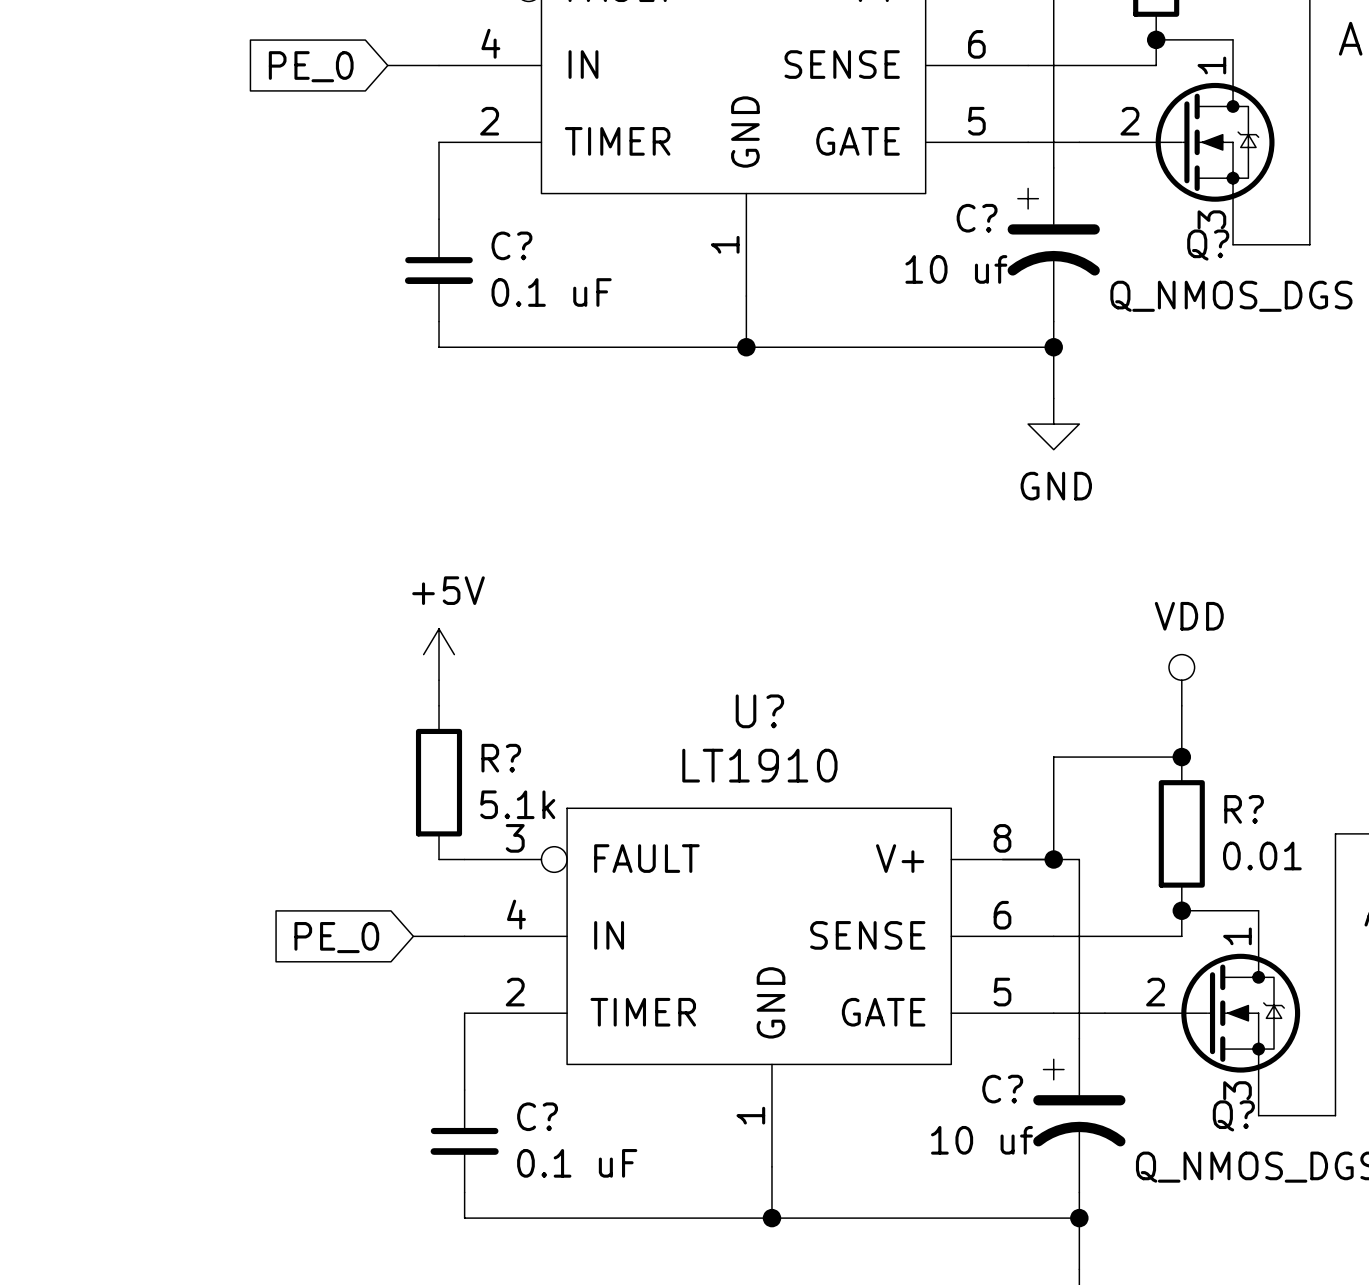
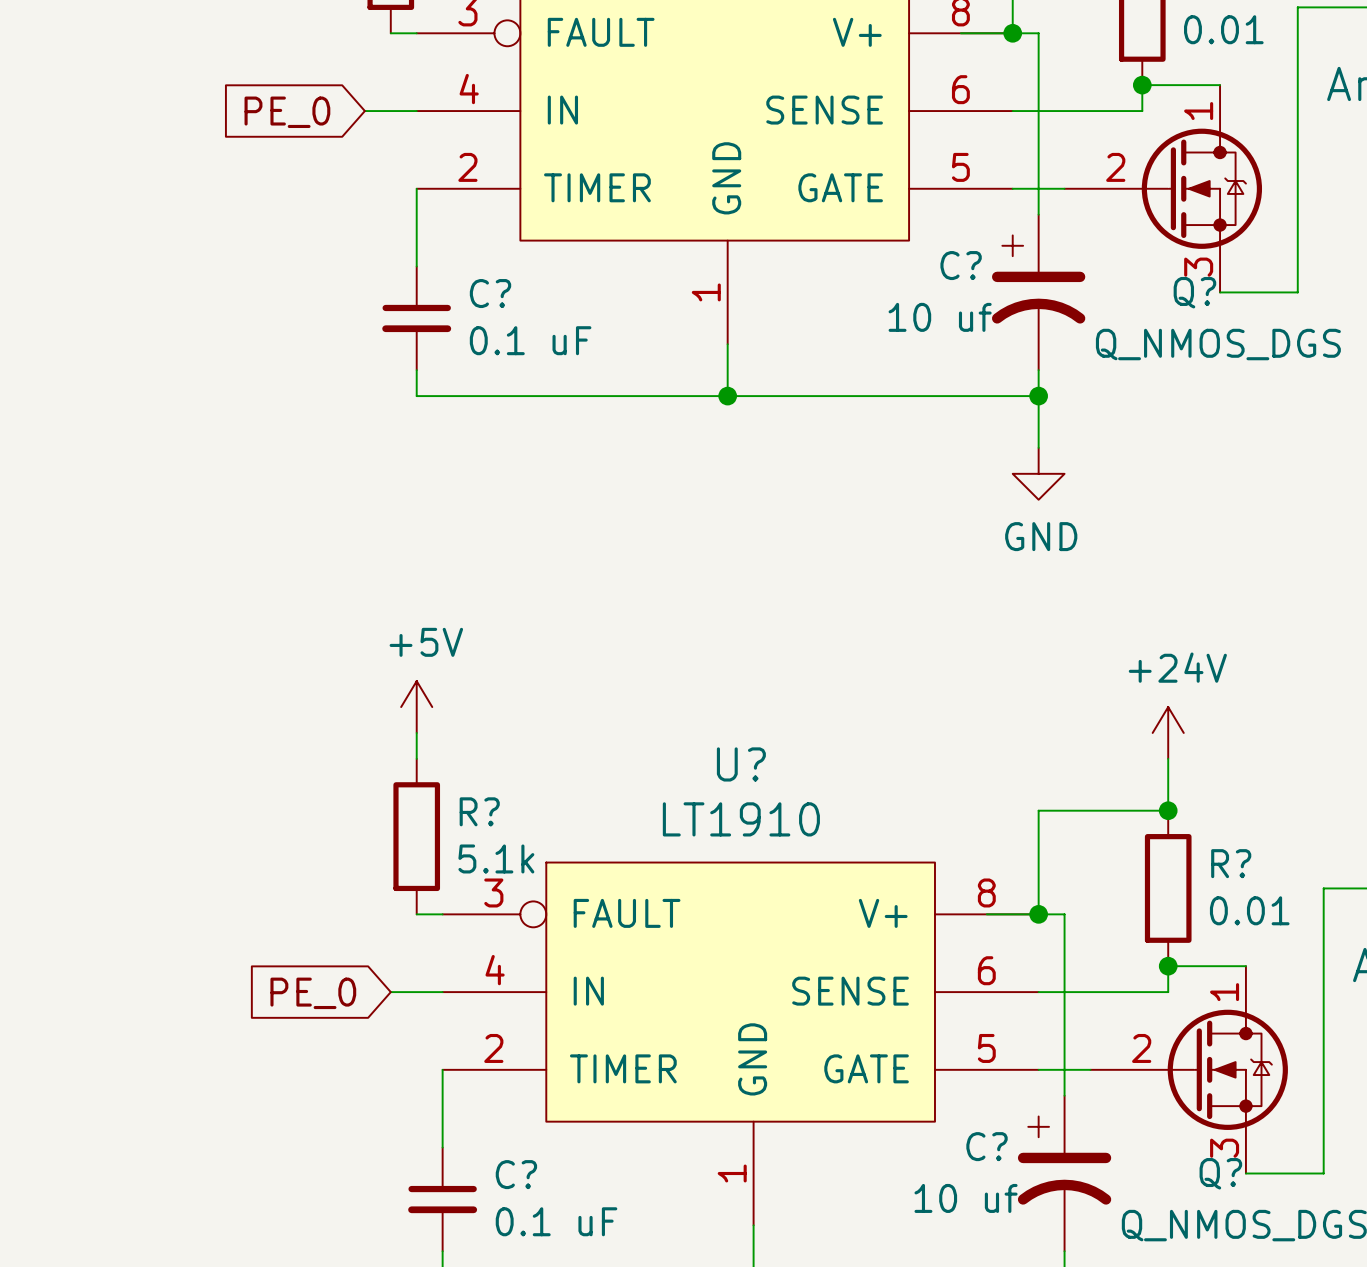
power symbol: VDD (1181, 680) -> +24V (1168, 732)

